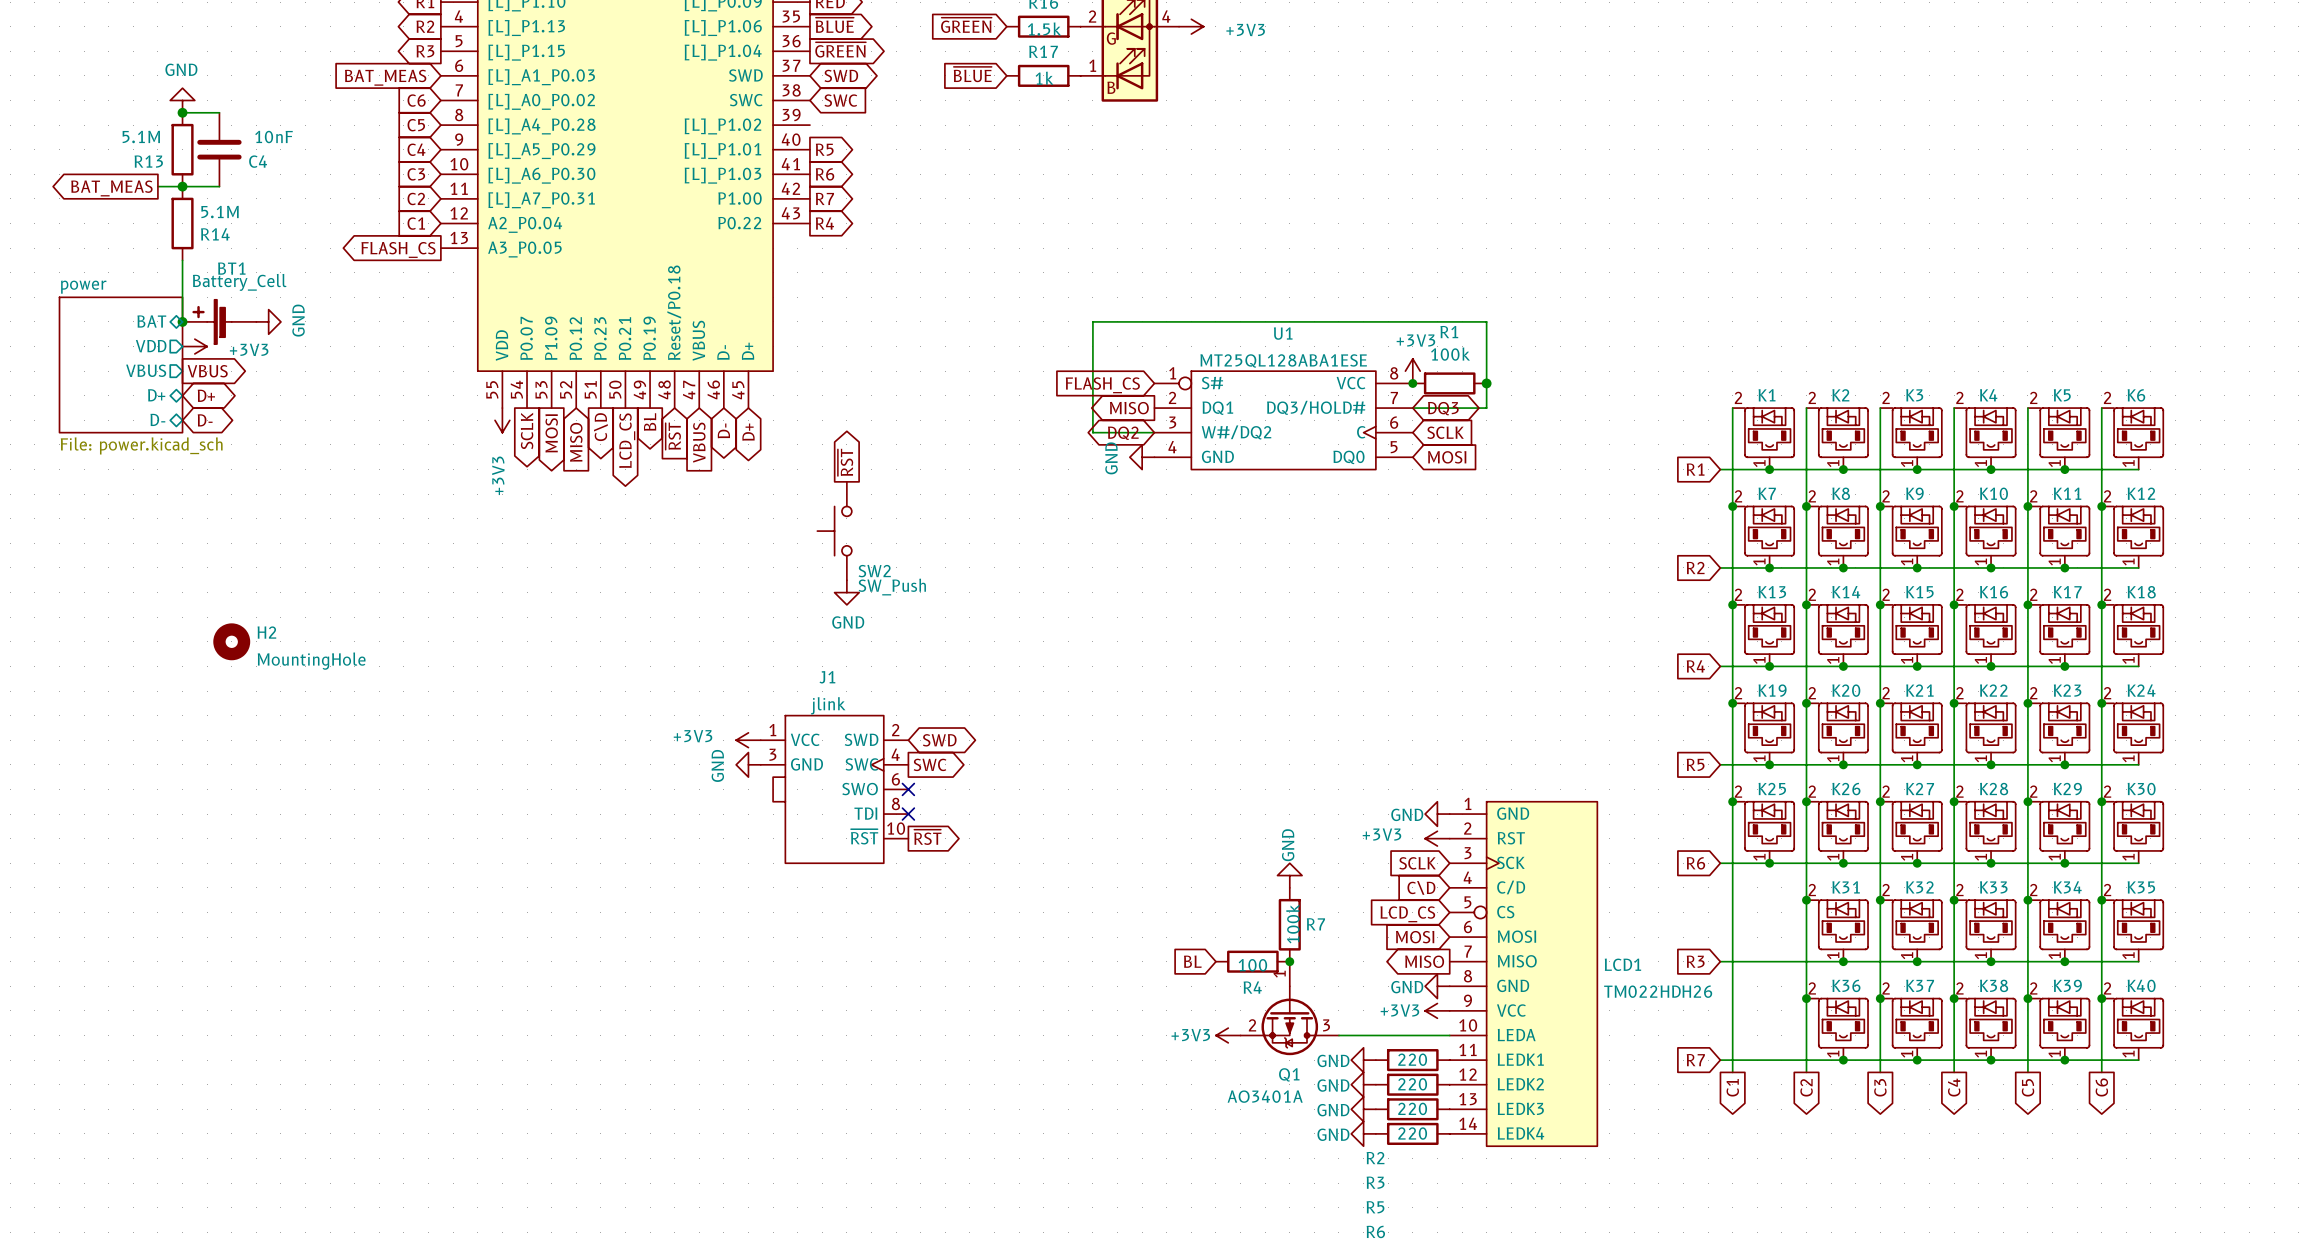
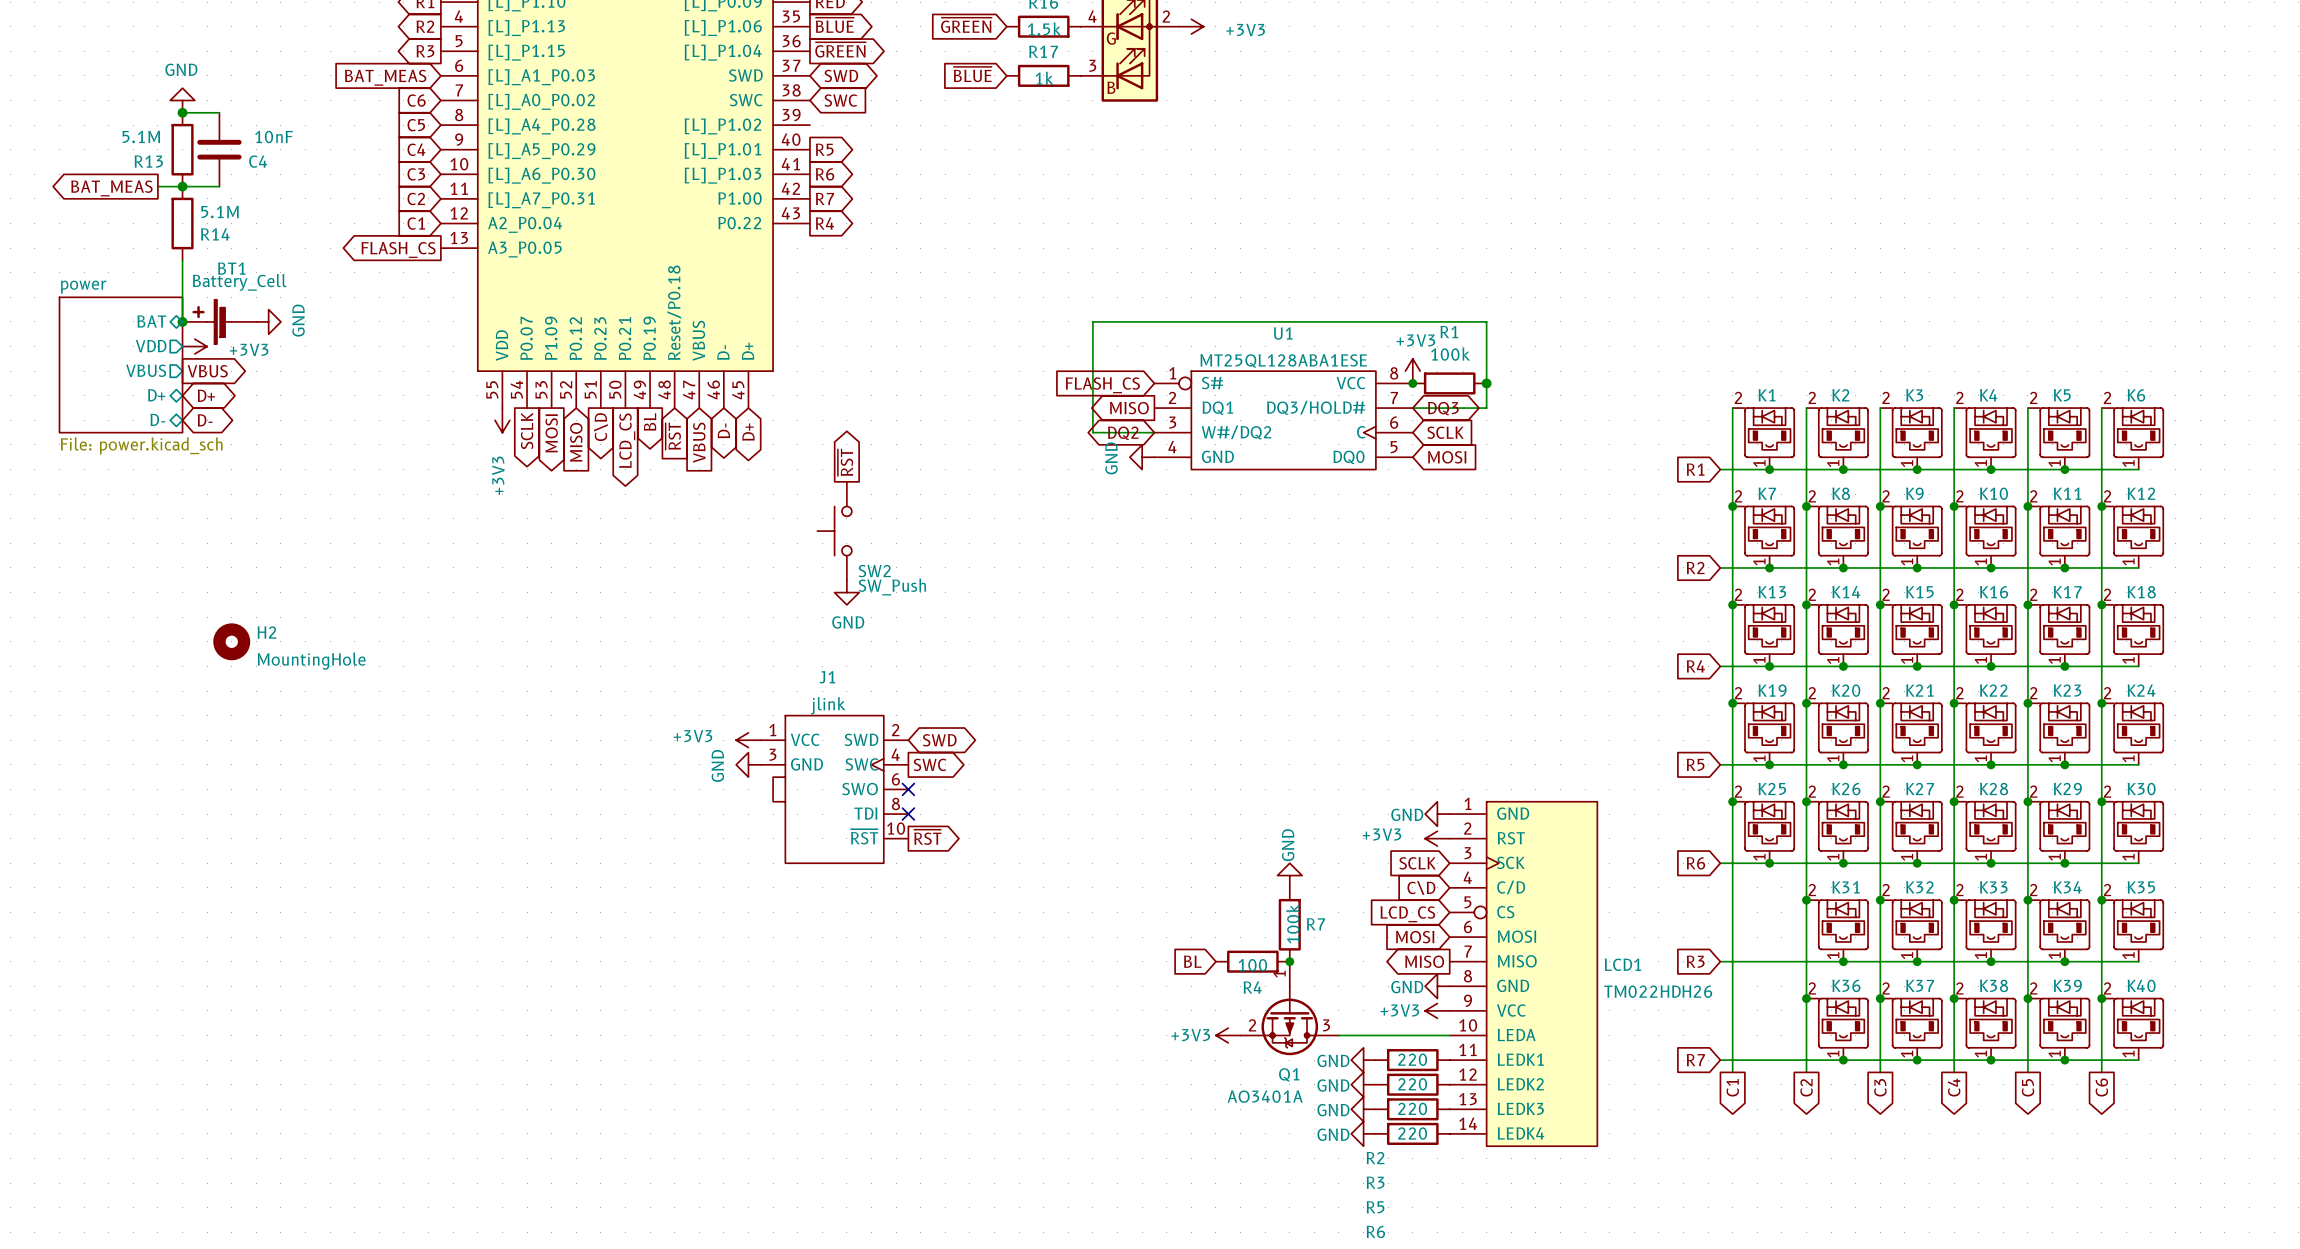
part pin number: 2 (1092, 16) -> 4 (1092, 16)
part pin number: 4 (1166, 16) -> 2 (1166, 16)
part pin number: 1 (1092, 65) -> 3 (1092, 65)

